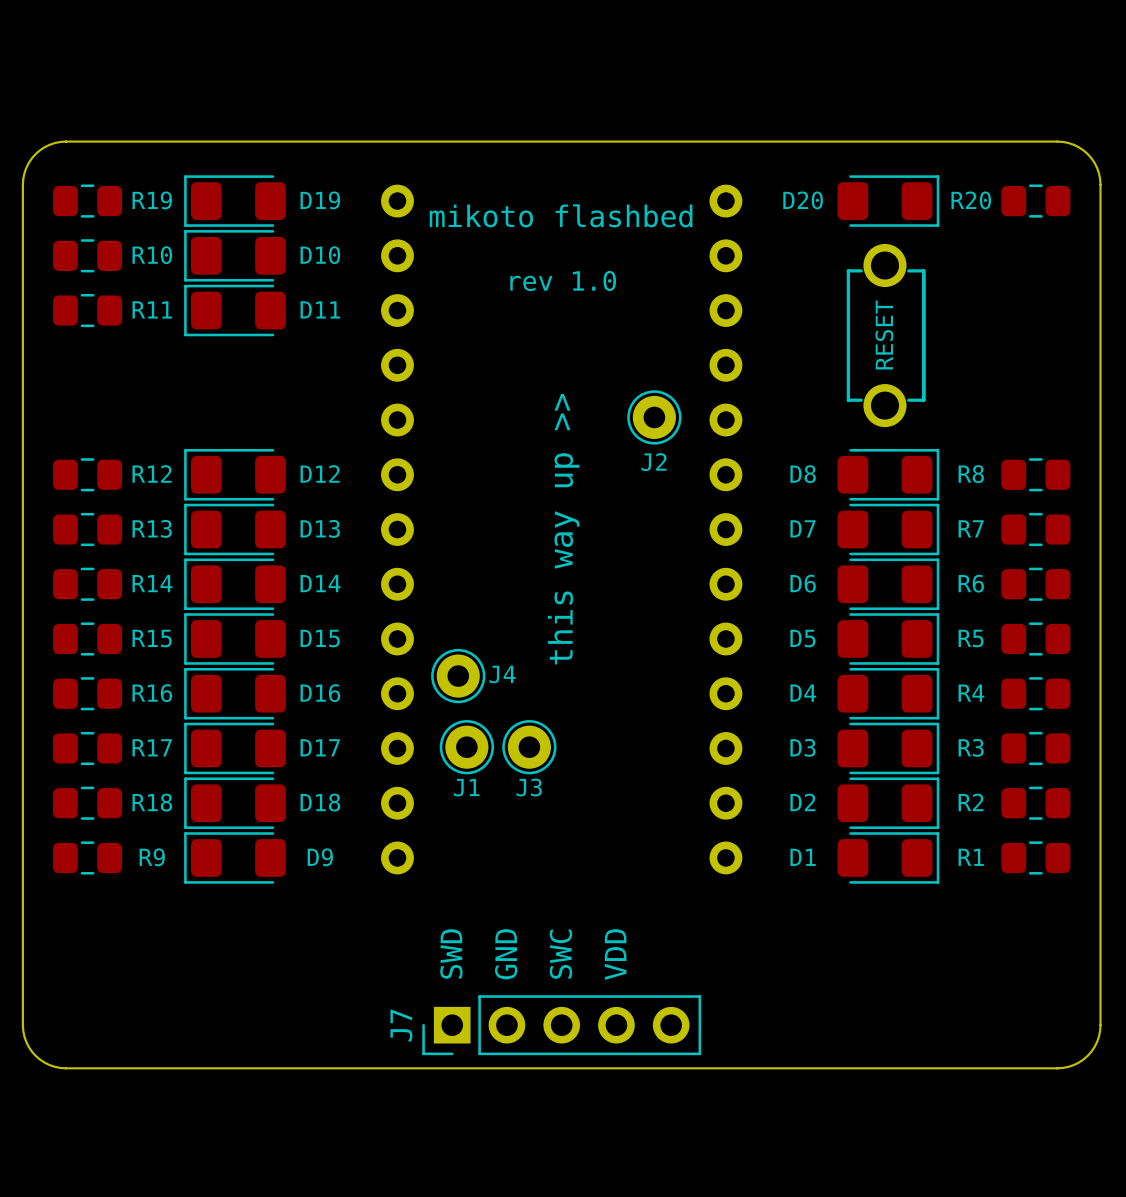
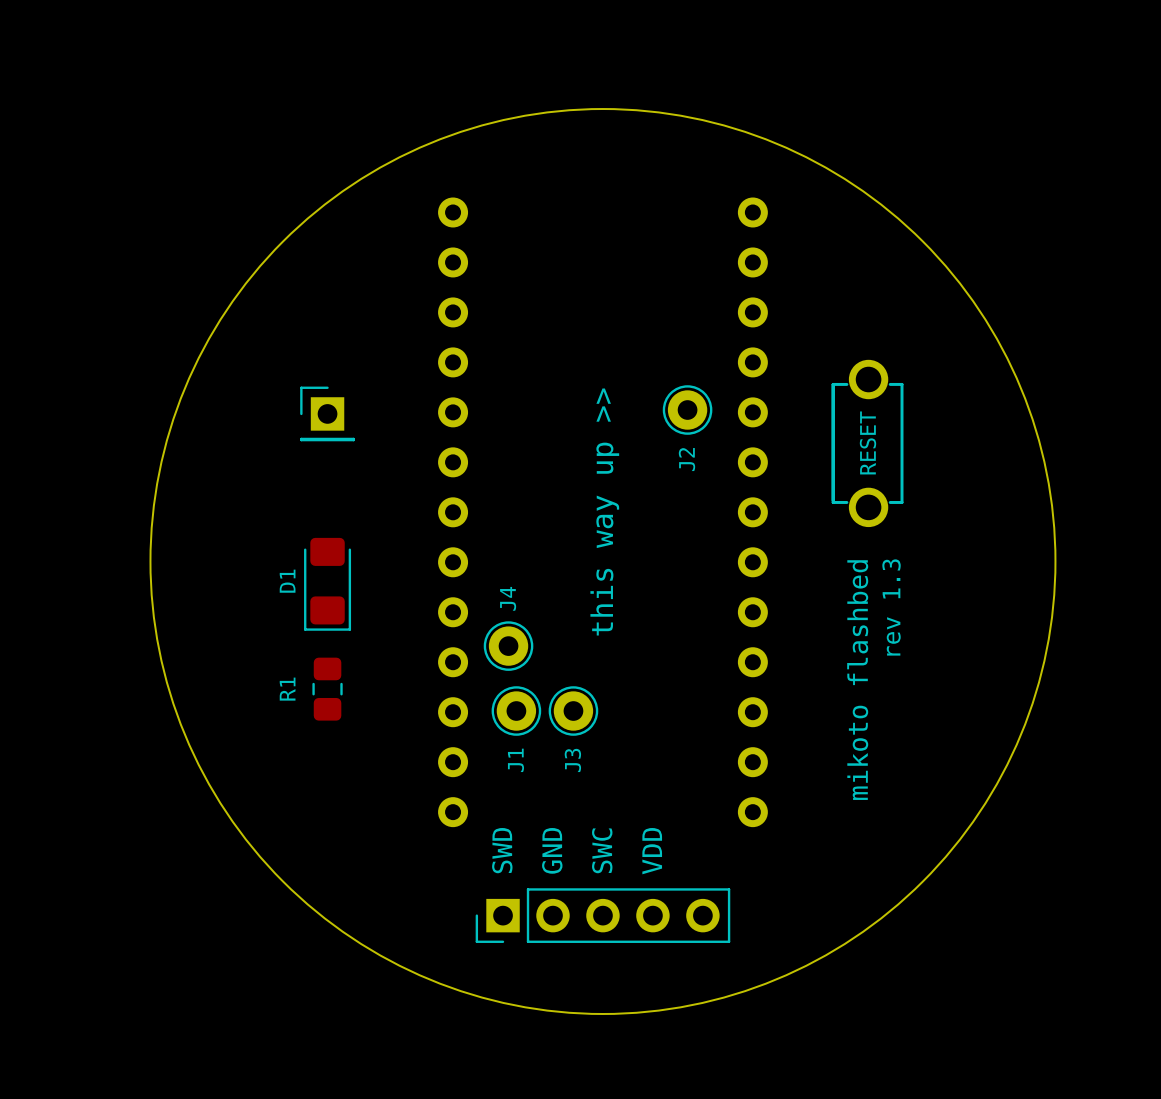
round board edge: none -> [149, 108, 1057, 1015]
board edge: (66, 141) (1057, 141) (1073, 144) (1087, 154) (1097, 168) (1100, 184) (1100, 1025) (1097, 1041) (1087, 1055) (1073, 1065) (1057, 1068) (66, 1068) (49, 1065) (35, 1055) (26, 1041) (22, 1025) (22, 184) (26, 168) (35, 154) (49, 144) (66, 141) -> none
R19: (87, 201) -> none
D19: (234, 201) -> none
D20: (888, 201) -> none
R20: (1035, 201) -> none
text: mikoto flashbed (561, 215) -> none
R10: (87, 255) -> none
D10: (234, 255) -> none
text: rev 1.0 (563, 280) -> none
R11: (87, 310) -> none
D11: (234, 310) -> none
part rotation: 0° (886, 335) -> 180° (867, 443)
part position: (886, 335) -> (867, 443)
part: none -> (327, 413)
J2 name rotation: 0° (654, 462) -> 90° counterclockwise (686, 459)
R12: (87, 474) -> none
D12: (234, 474) -> none
D8: (888, 474) -> none
R8: (1035, 474) -> none
R13: (87, 529) -> none
D13: (234, 529) -> none
D7: (888, 529) -> none
R7: (1035, 529) -> none
R14: (87, 584) -> none
D14: (234, 584) -> none
D6: (888, 584) -> none
R6: (1035, 584) -> none
text: none -> rev 1.3 (891, 607)
R15: (87, 638) -> none
D15: (234, 638) -> none
D5: (888, 638) -> none
R5: (1035, 638) -> none
J4 name rotation: 0° (502, 674) -> 90° counterclockwise (508, 598)
J4 name position: J4 (502, 674) -> J4 (508, 598)
R16: (87, 693) -> none
D16: (234, 693) -> none
D4: (888, 693) -> none
R4: (1035, 693) -> none
text: none -> mikoto flashbed (857, 680)
R17: (87, 748) -> none
D17: (234, 748) -> none
D3: (888, 748) -> none
R3: (1035, 748) -> none
J1 name rotation: 0° (466, 787) -> 90° counterclockwise (515, 760)
J3 name rotation: 0° (529, 787) -> 90° counterclockwise (572, 760)
R18: (87, 803) -> none
D18: (234, 803) -> none
D2: (888, 803) -> none
R2: (1035, 803) -> none
R9: (87, 857) -> none
D9: (234, 857) -> none
D1 rotation: 0° (888, 857) -> 90° clockwise (327, 584)
D1 position: (888, 857) -> (327, 584)
R1 rotation: 0° (1035, 857) -> 90° clockwise (327, 689)
R1 position: (1035, 857) -> (327, 689)
text position: SWD (451, 954) -> SWD (502, 850)
text position: GND (506, 954) -> GND (552, 850)
text position: SWC (560, 954) -> SWC (602, 850)
text position: VDD (615, 954) -> VDD (652, 851)
part: none -> (602, 915)
J7: (561, 1025) -> none

